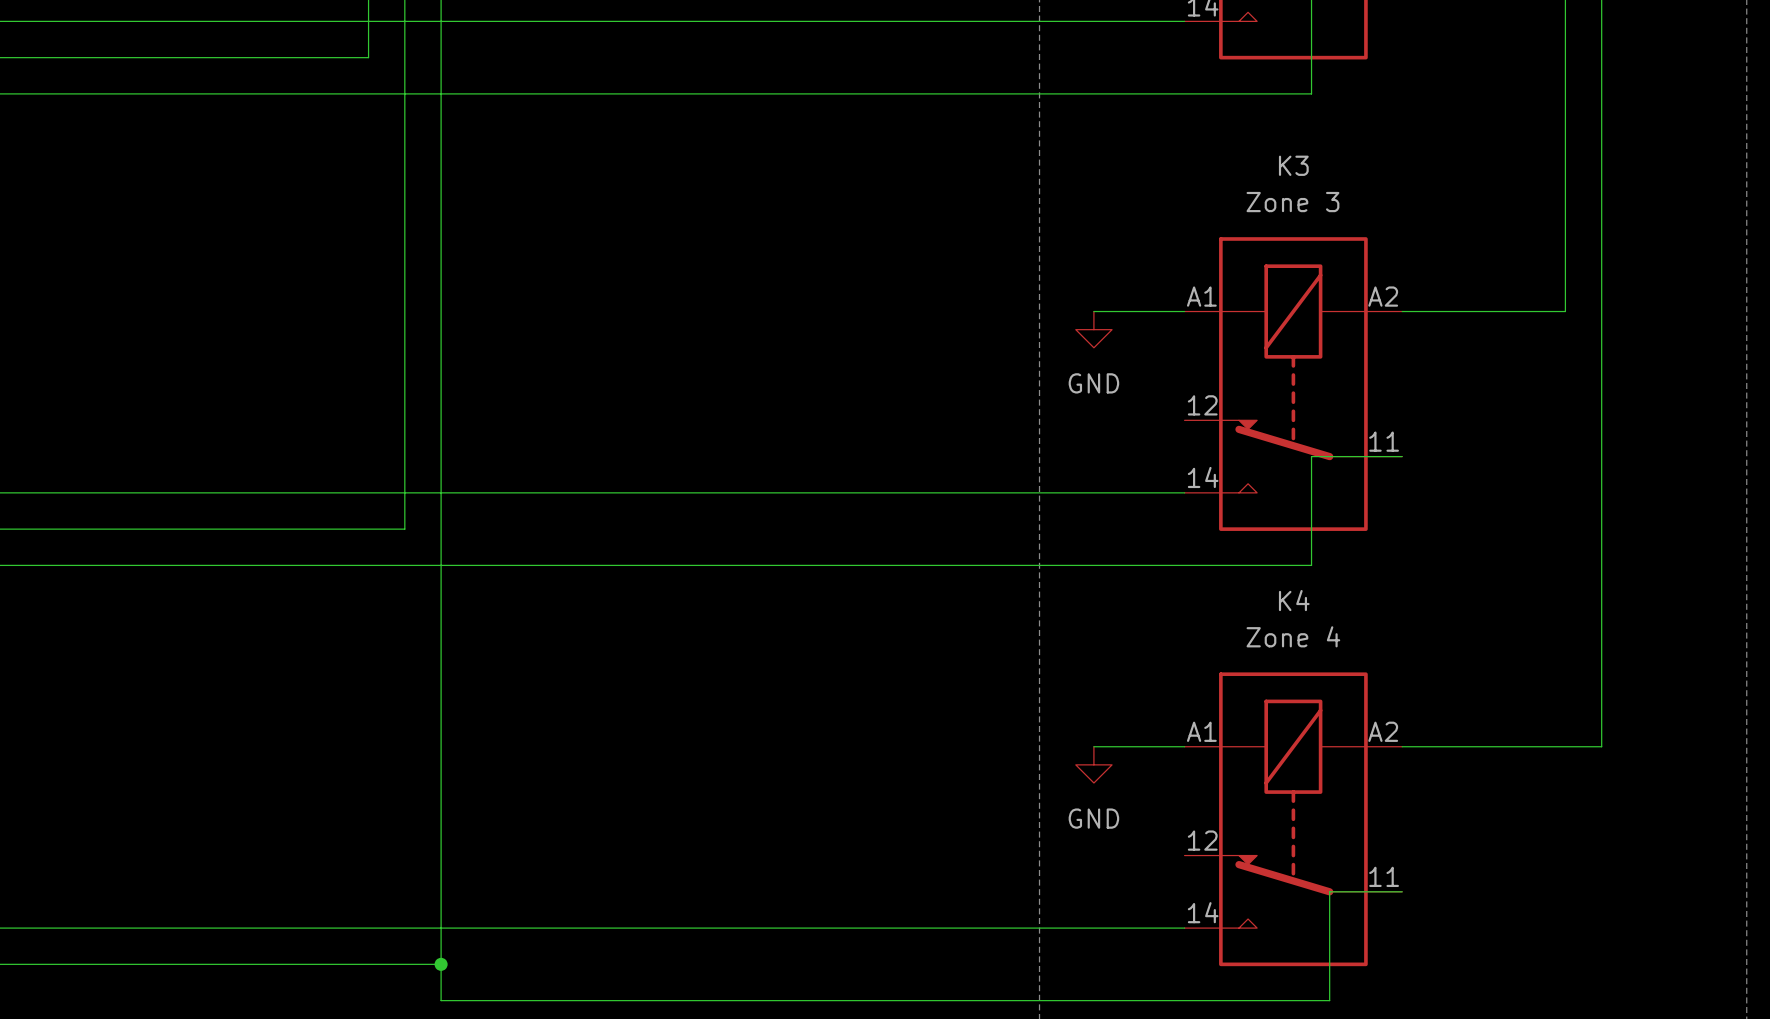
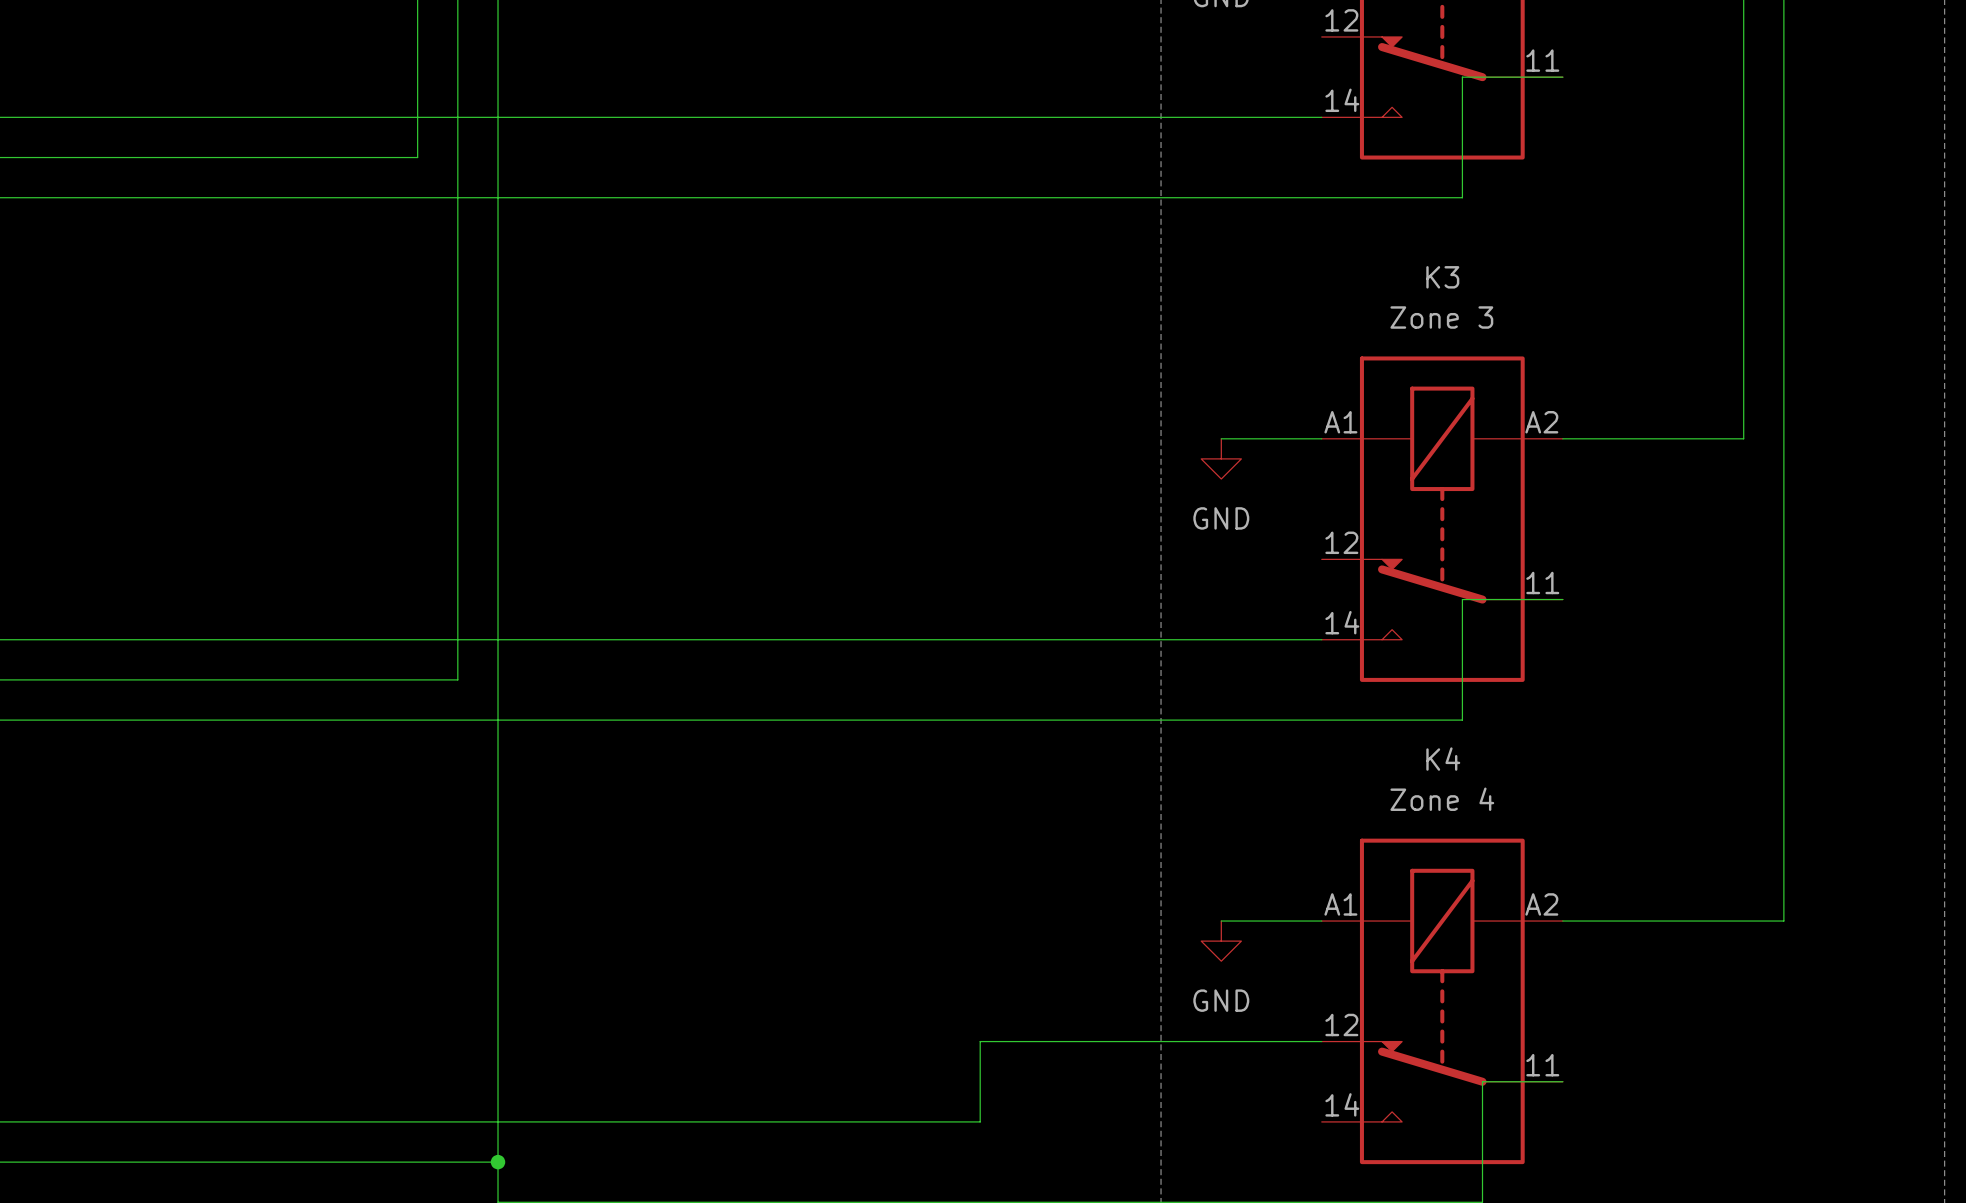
wire: (876, 928) (1184, 928) -> (980, 1121) (980, 1041) (1321, 1041)

